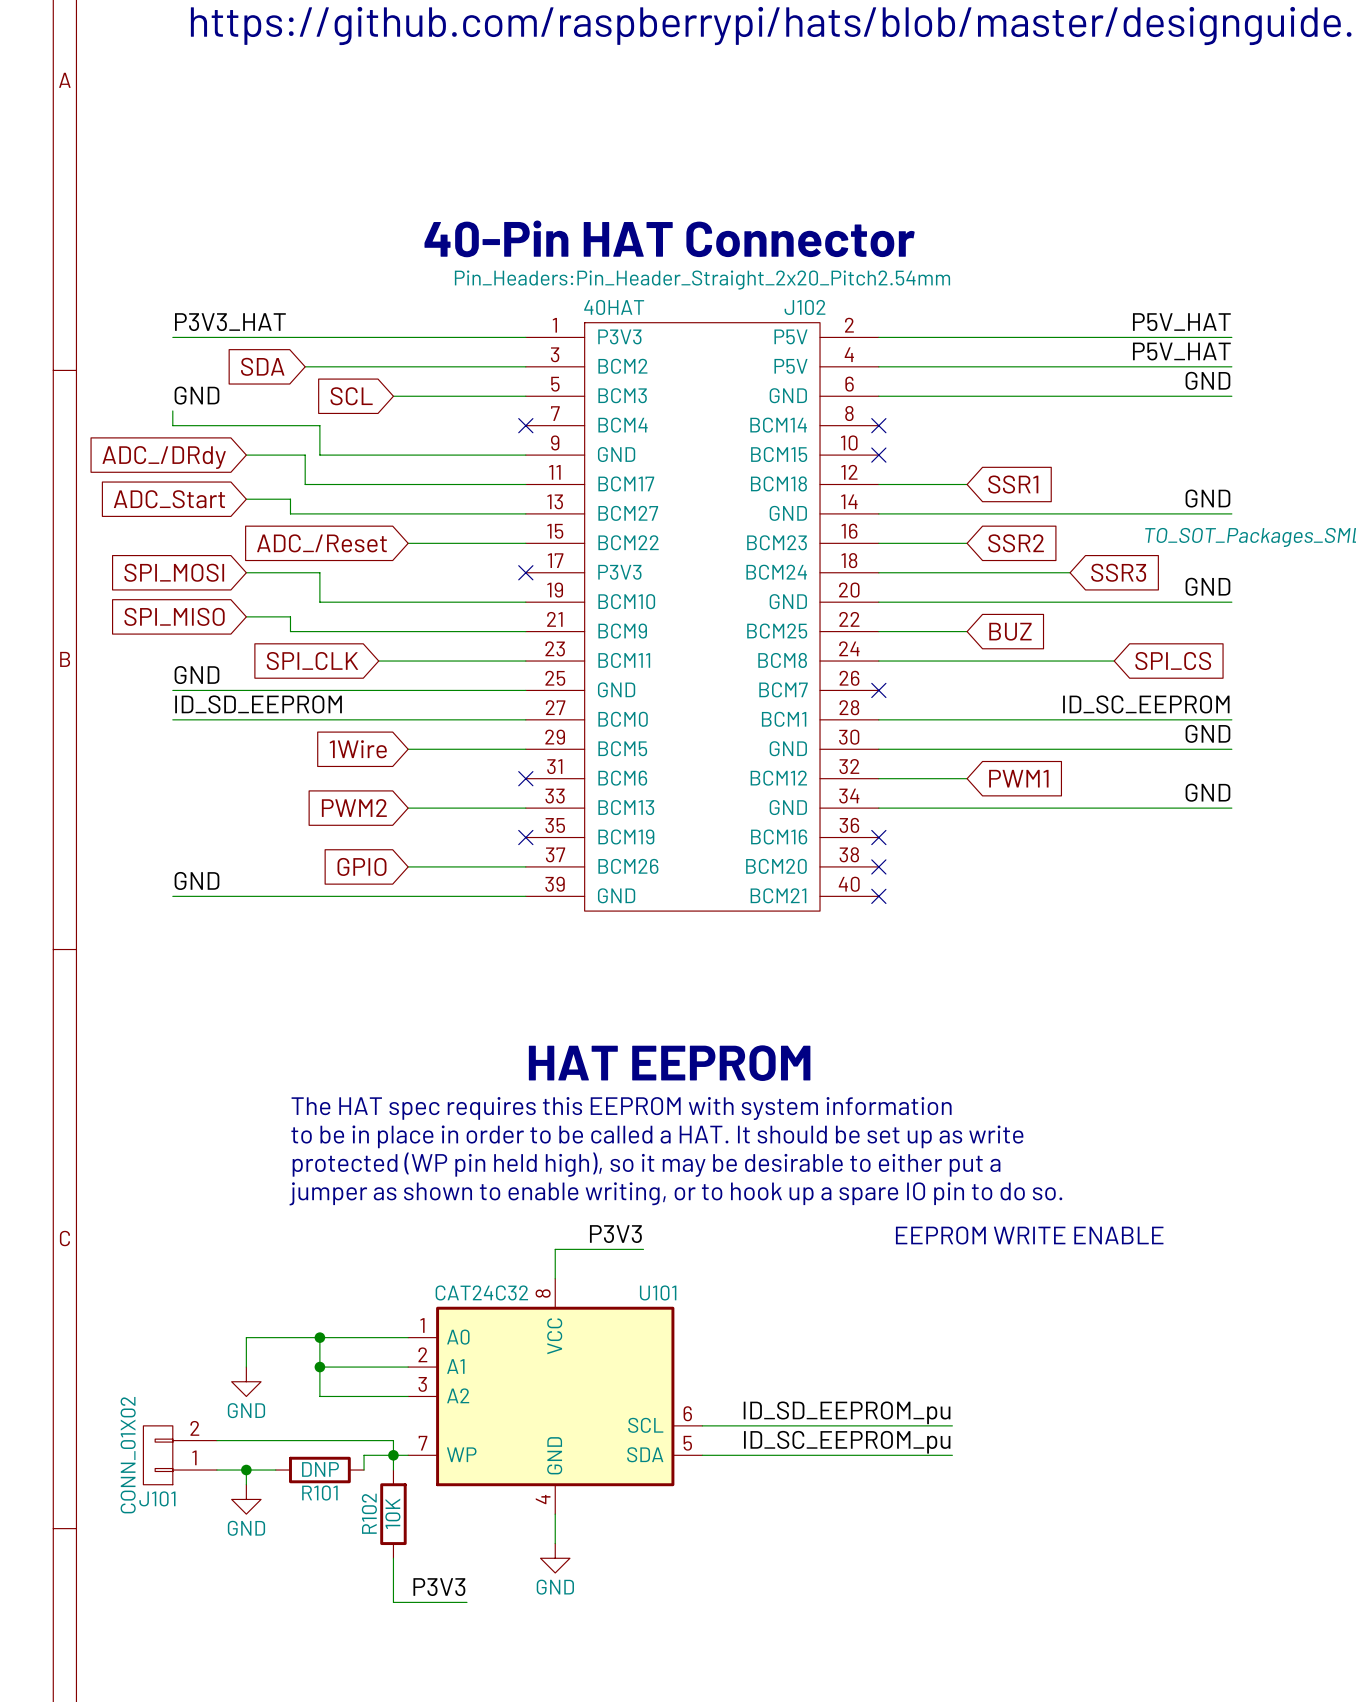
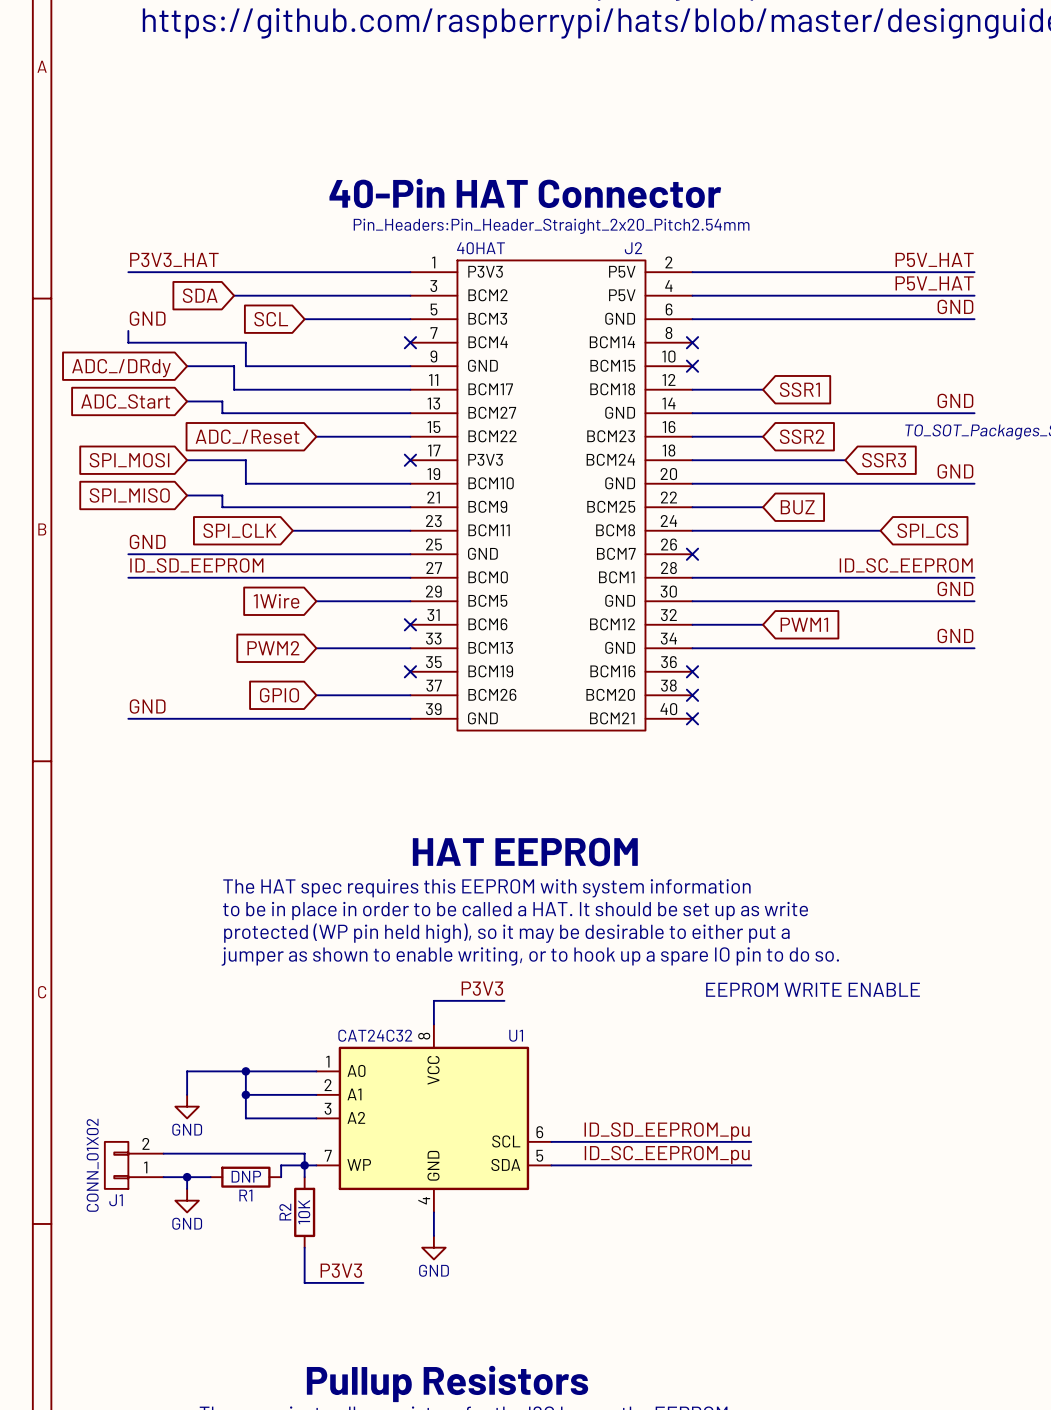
J102 name: J102 (804, 307) -> J2 (633, 248)
U101 name: U101 (658, 1292) -> U1 (516, 1035)
R101 name: R101 (319, 1493) -> R1 (245, 1195)
J101 name: J101 (157, 1498) -> J1 (116, 1200)
R102 name: R102 (369, 1513) -> R2 (285, 1212)

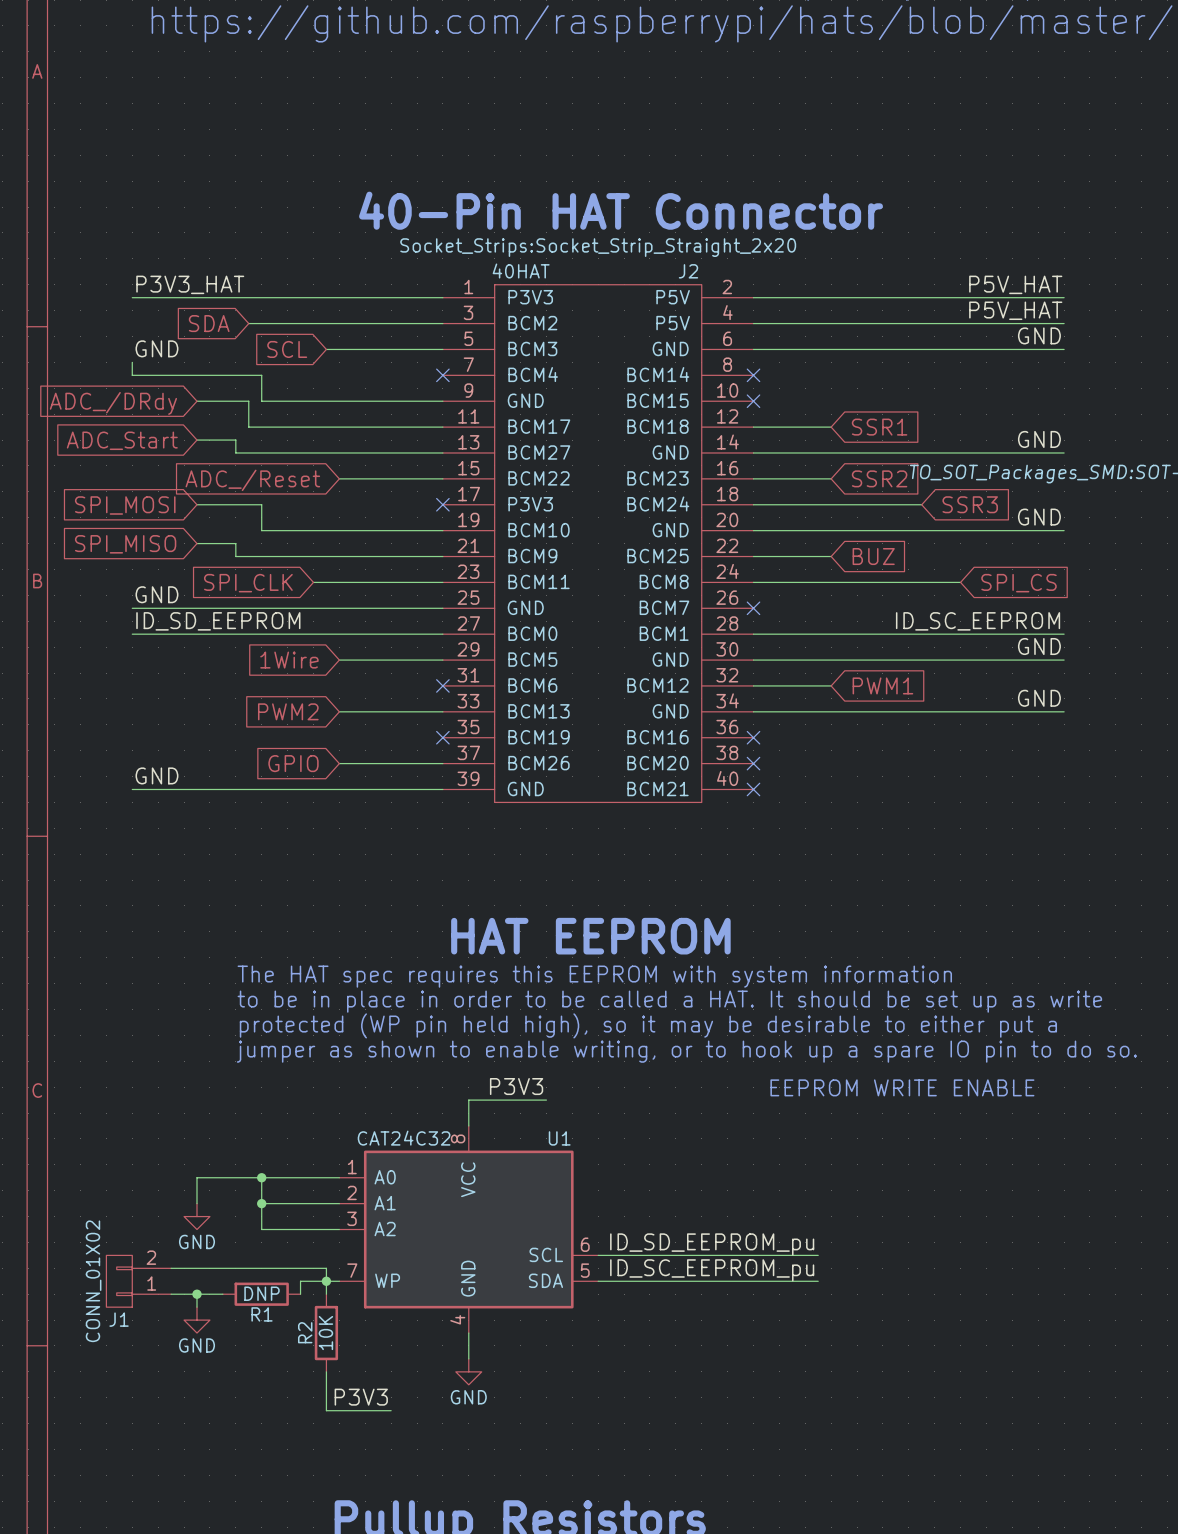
J2 text: Pin_Headers:Pin_Header_Straight_2x20_Pitch2.54mm (551, 226) -> Socket_Strips:Socket_Strip_Straight_2x20 (598, 247)

